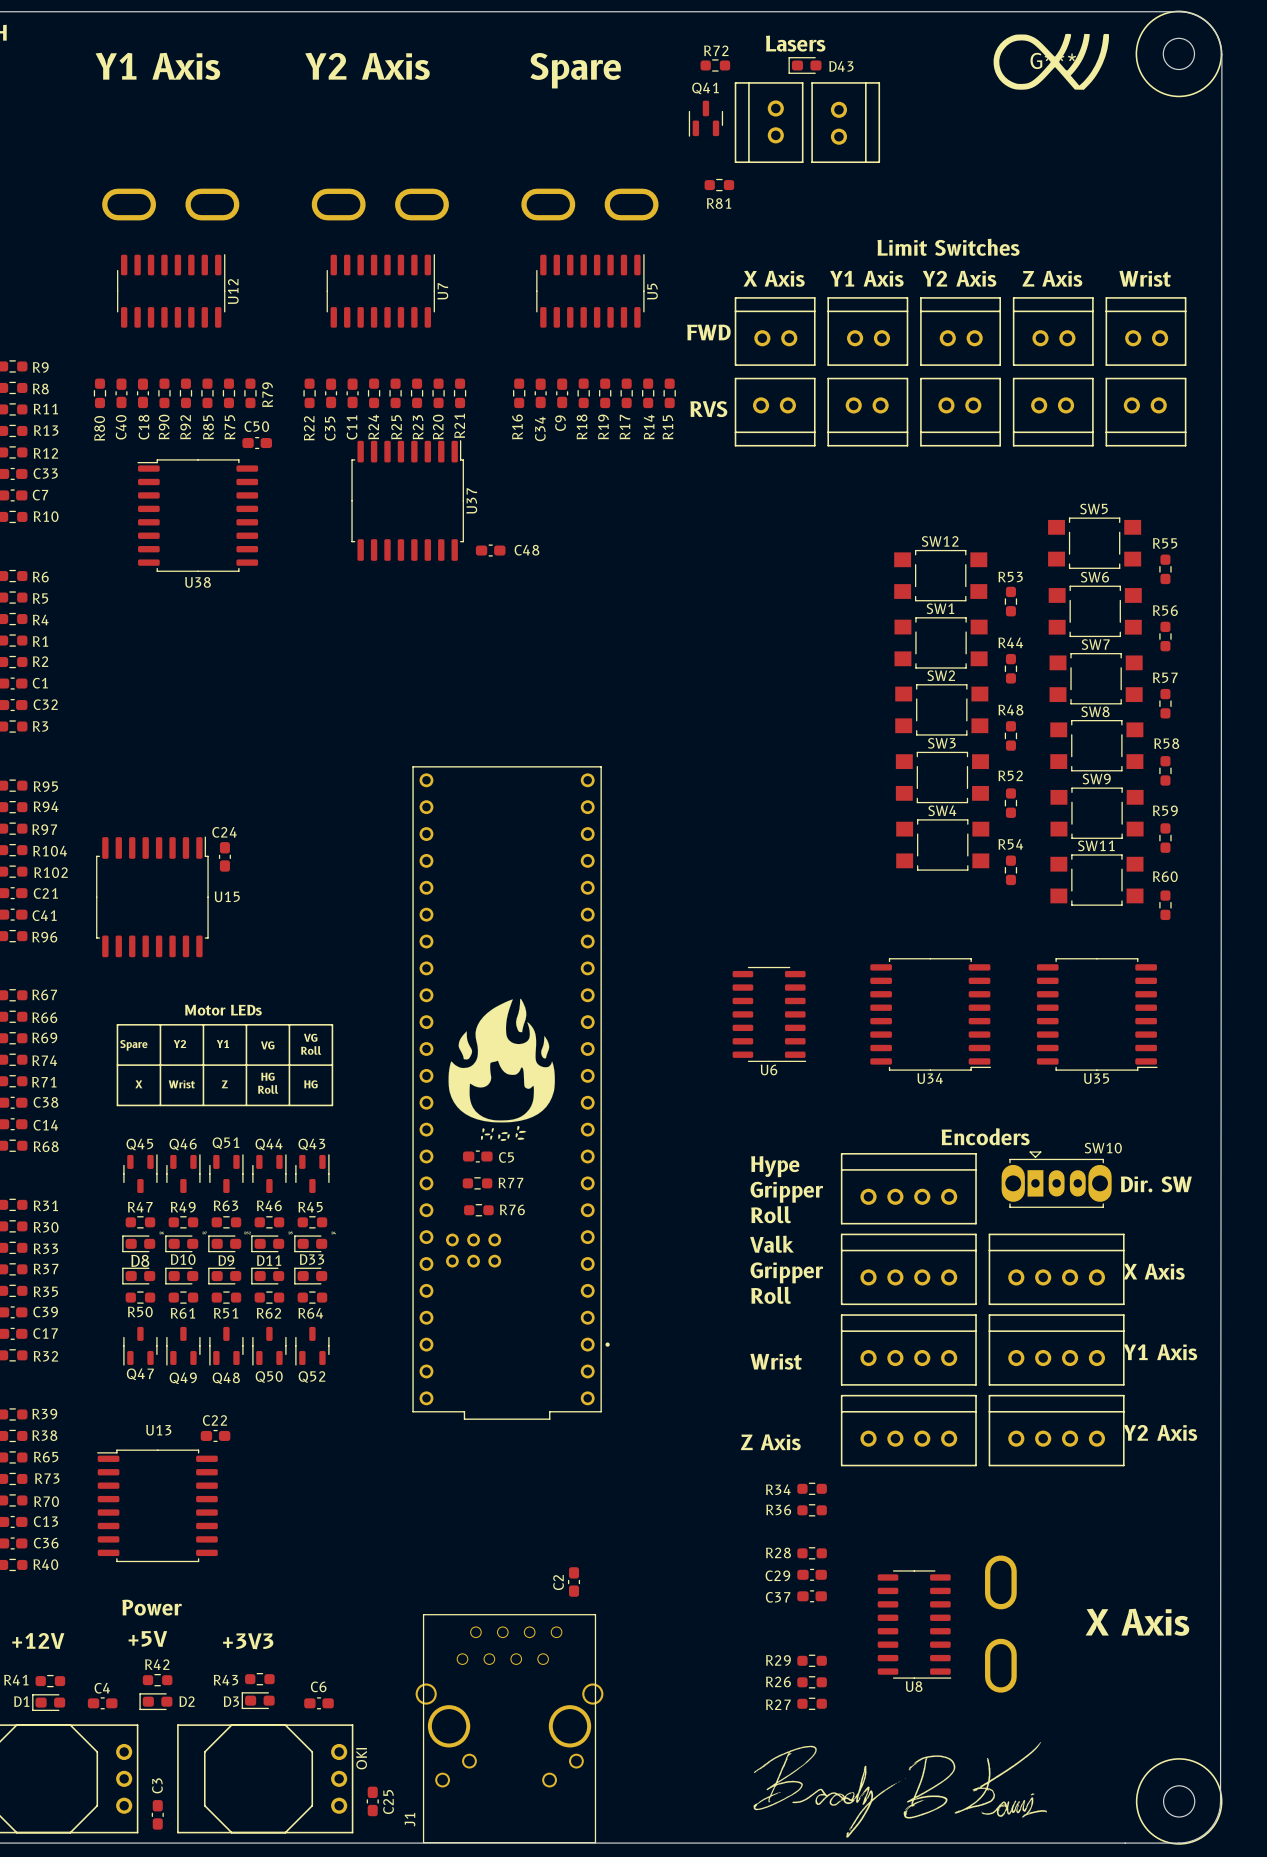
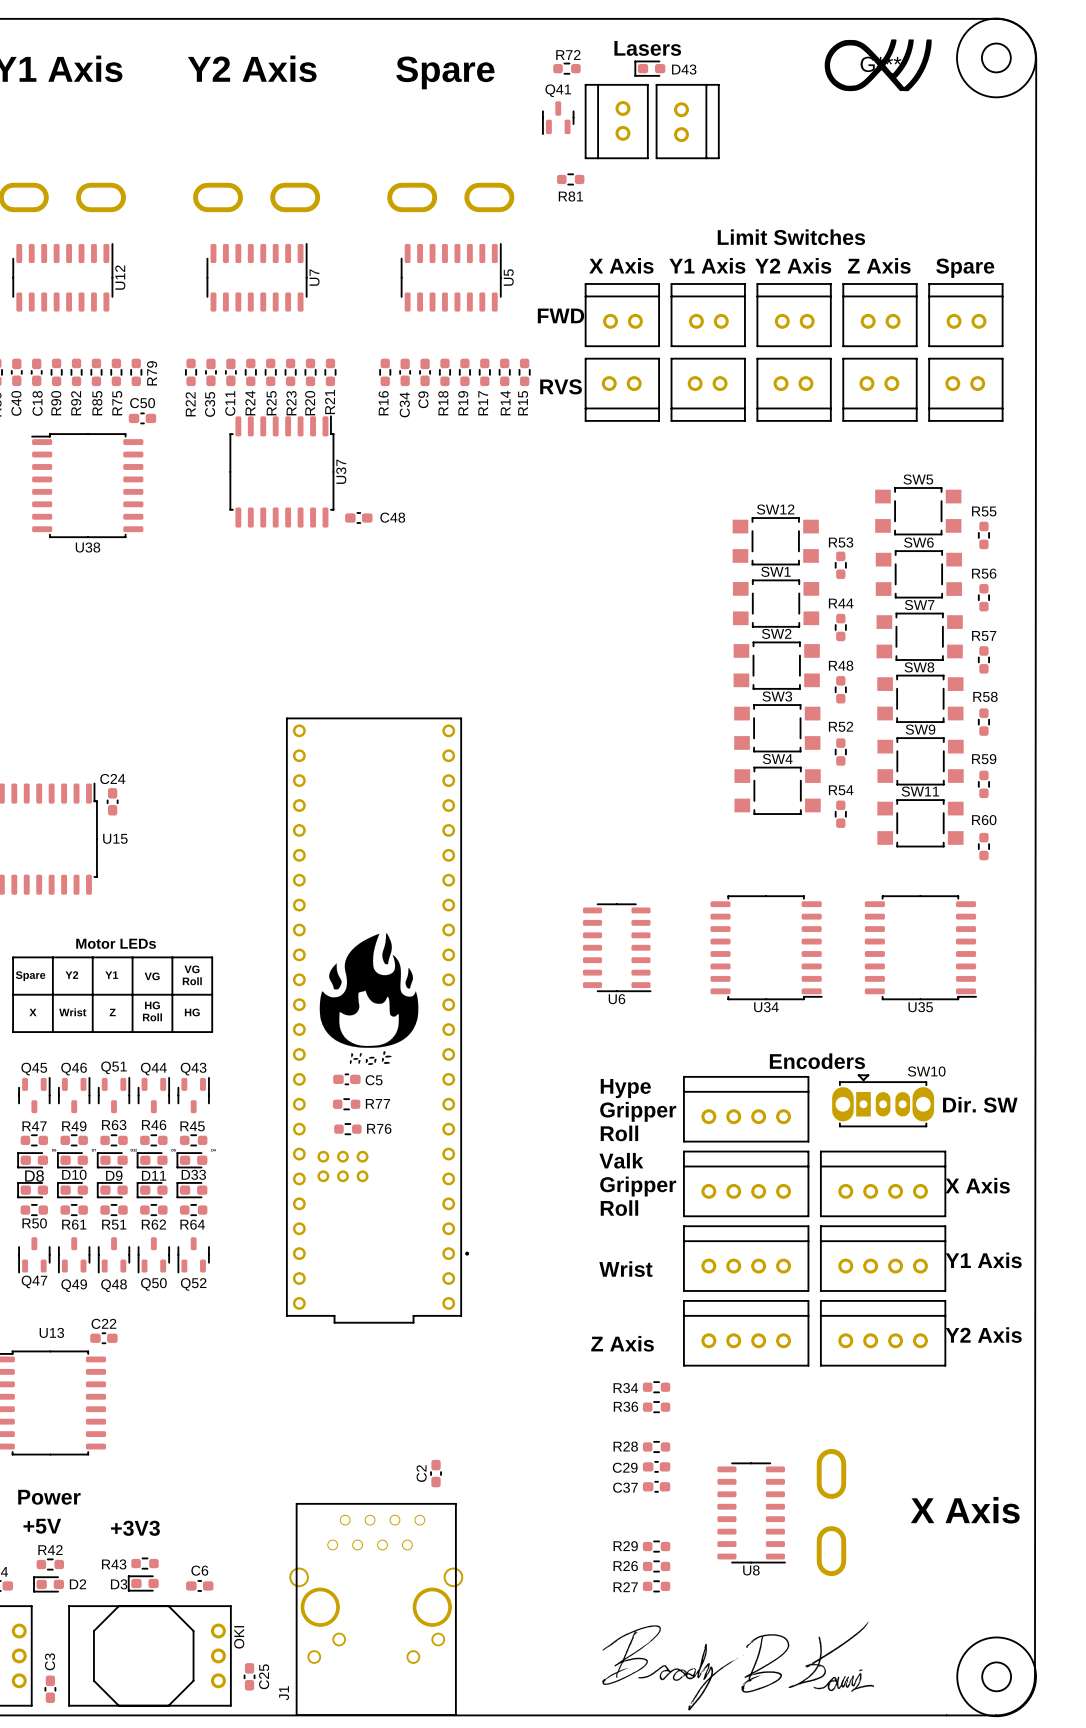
text: Wrist (1145, 278) -> Spare (965, 268)

